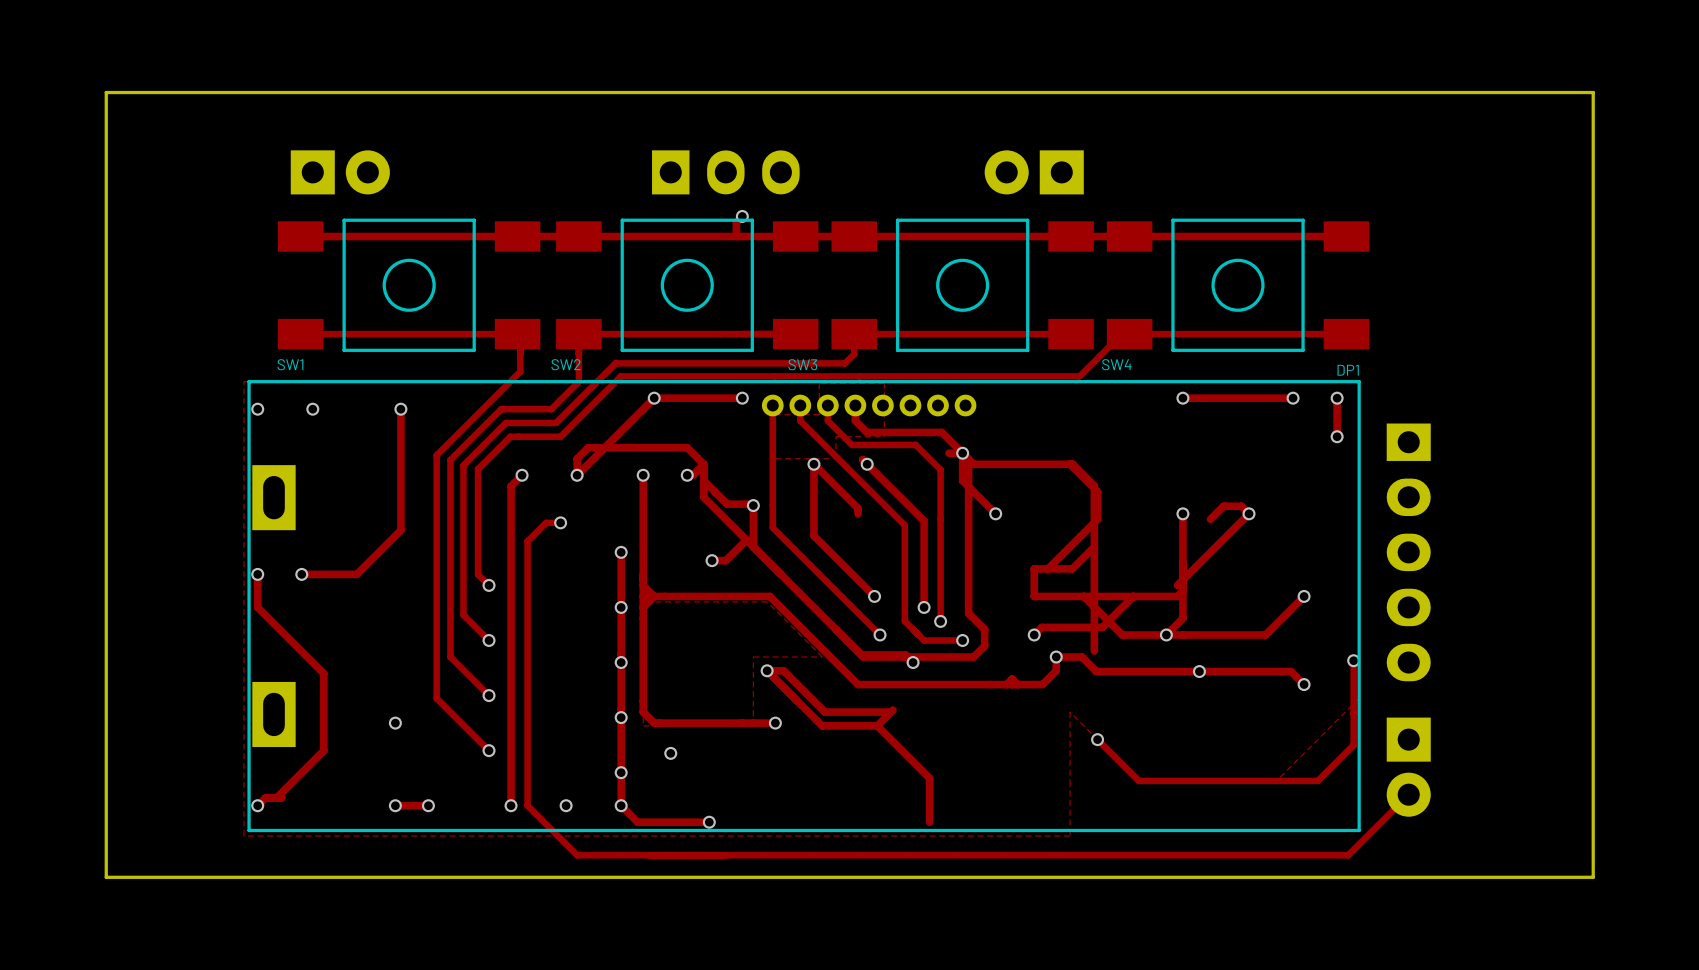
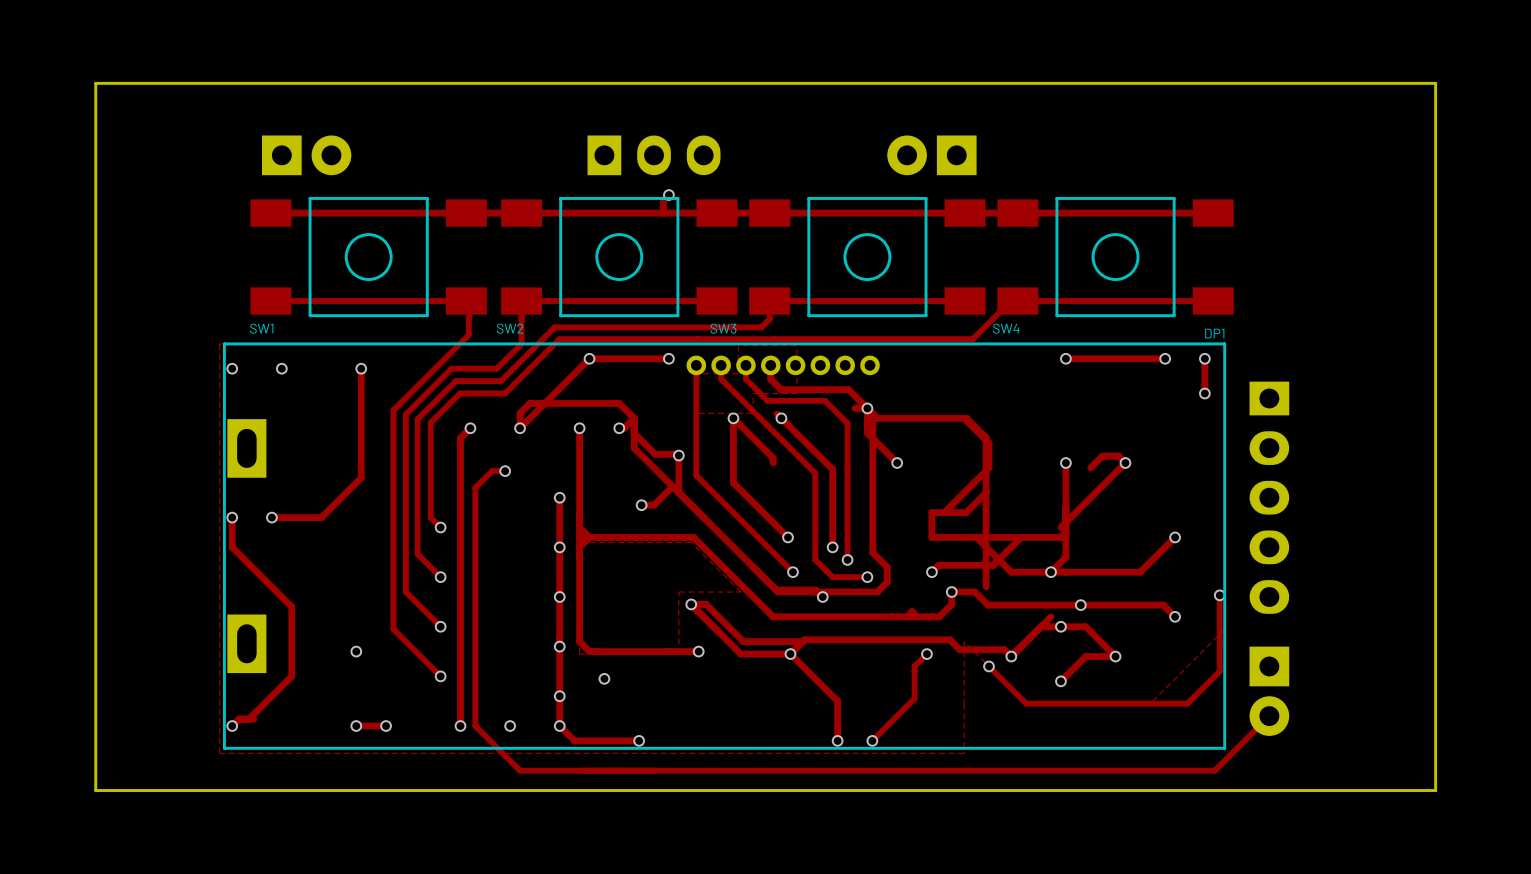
track: none -> (1051, 616) (1011, 656) (1004, 649) (959, 649) (950, 639) (804, 639)
track: none -> (1041, 626) (1085, 626) (1115, 656) (1085, 656) (1060, 681)
via: none -> (1060, 626)
via: none -> (790, 654)
track: none -> (926, 654) (914, 666) (914, 698) (872, 740)
via: none -> (926, 654)
via: none -> (1011, 656)
via: none -> (1115, 656)
via: none -> (1060, 681)
via: none -> (837, 740)
via: none -> (872, 740)

